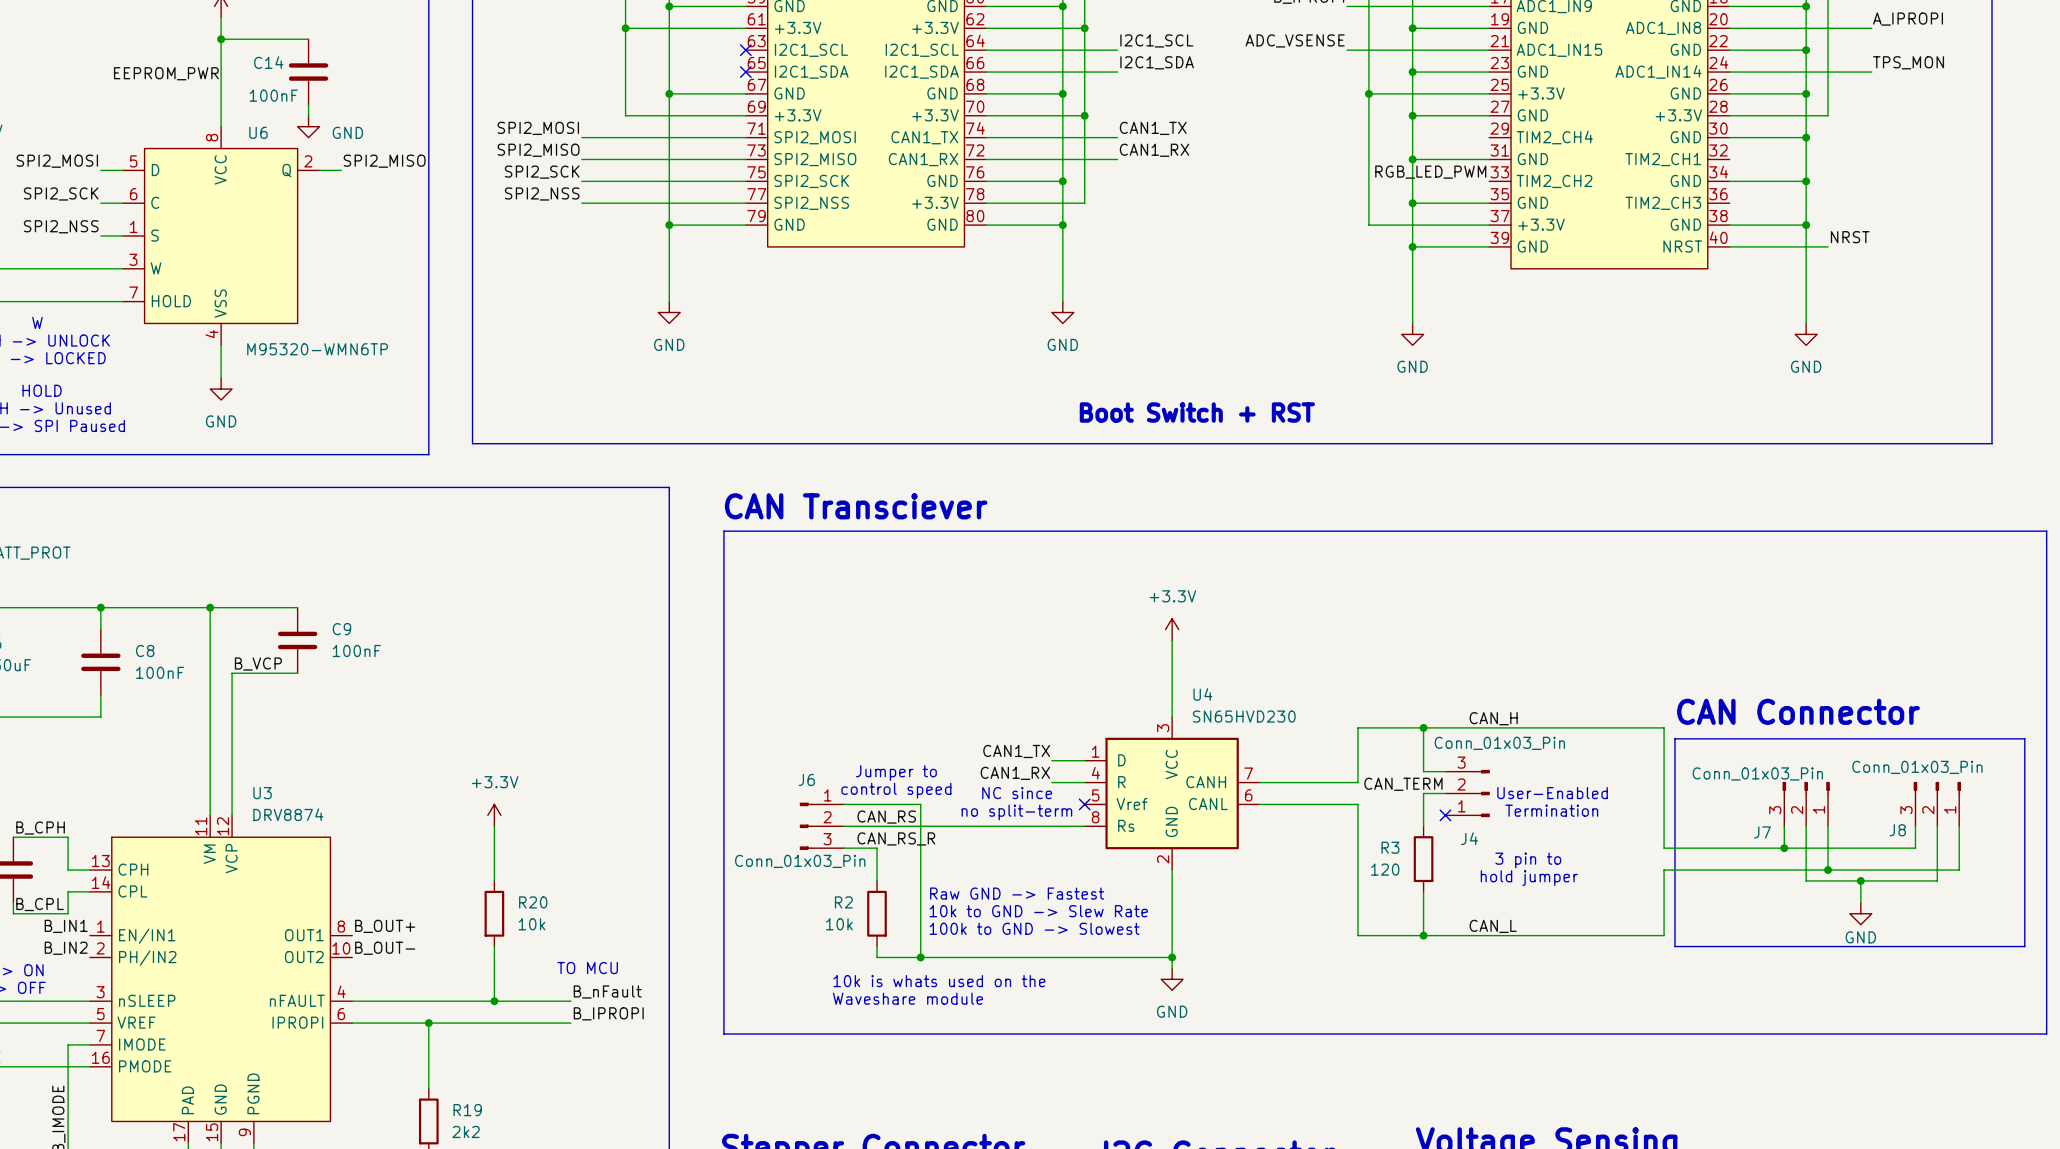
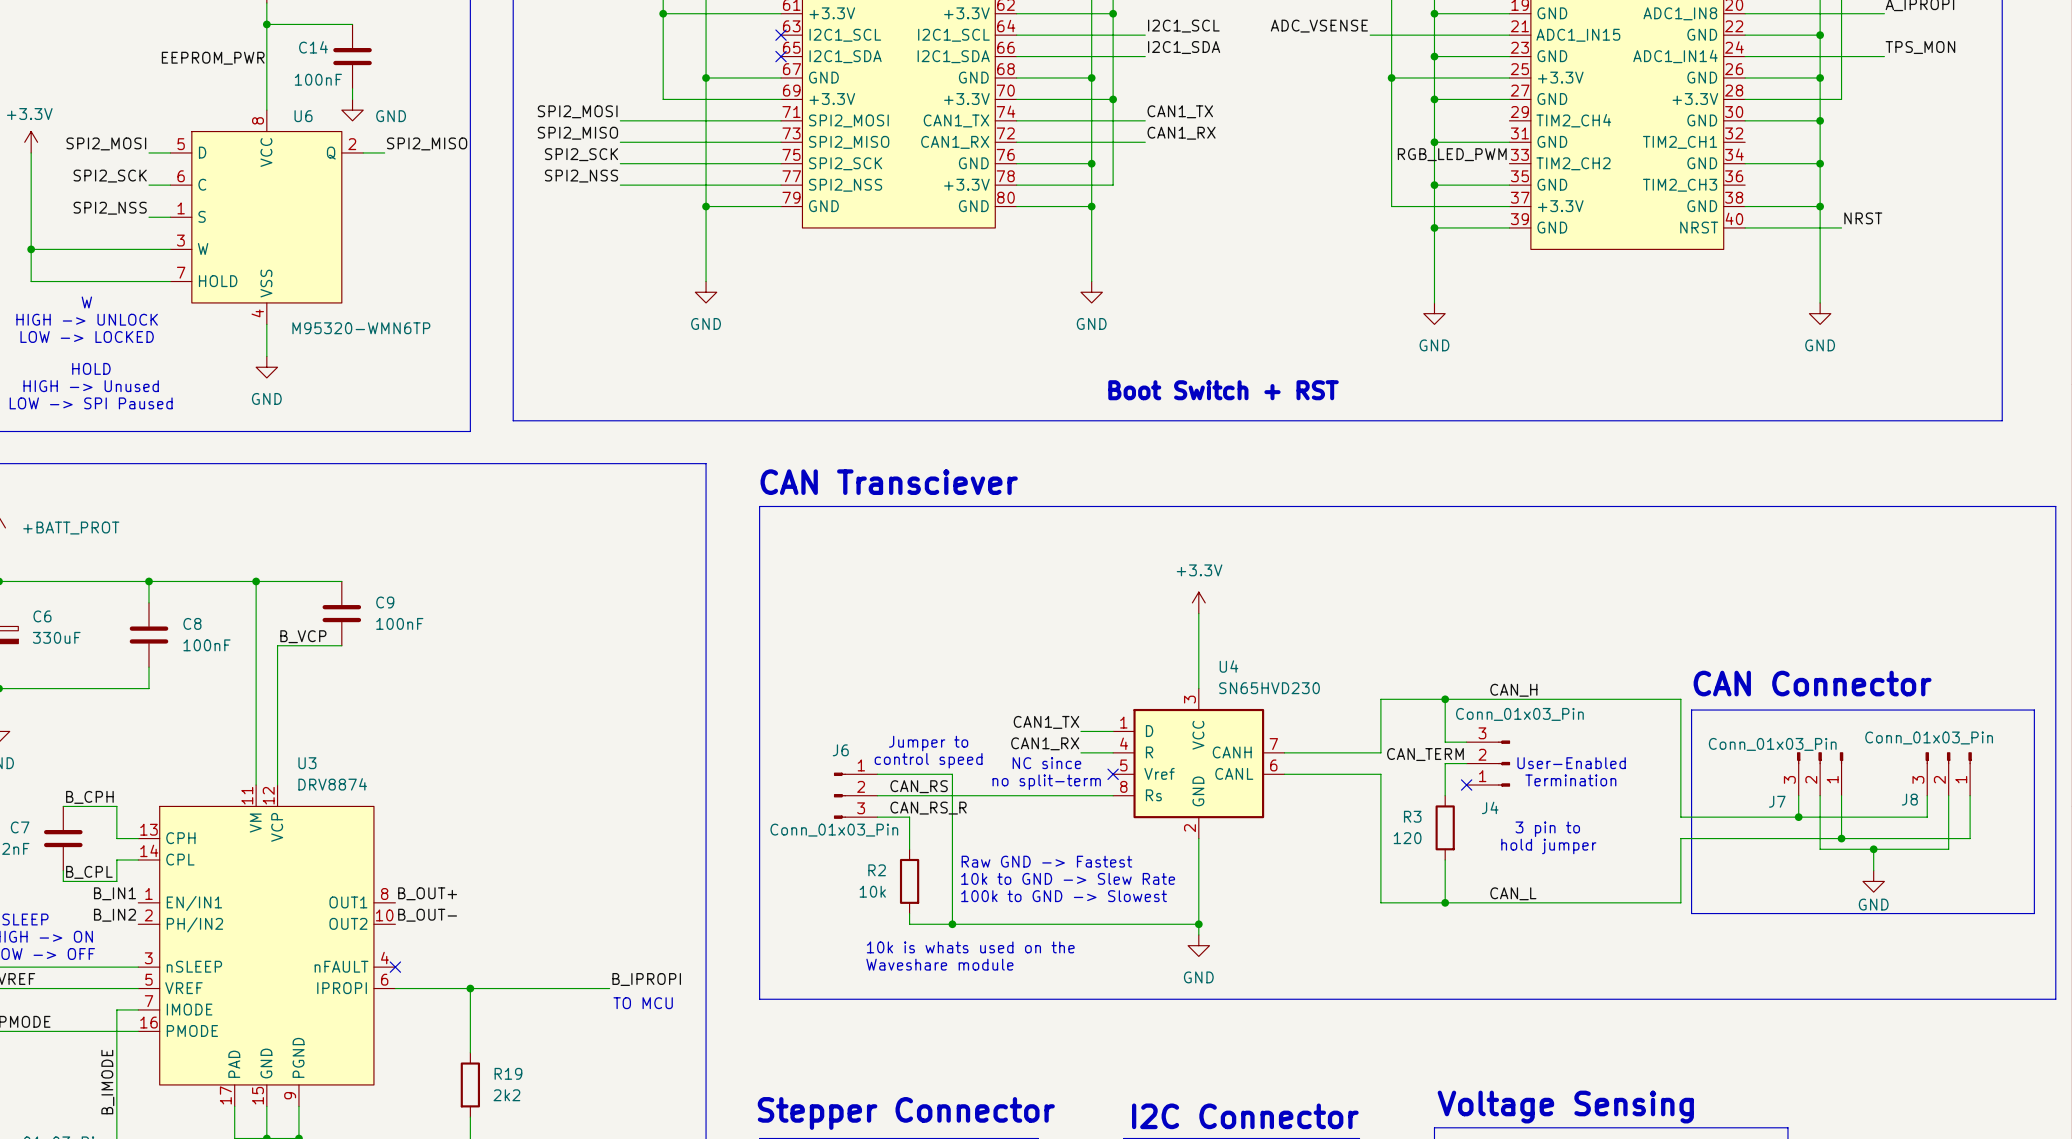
power symbol: +3.3V (494, 815) -> none
wire: (494, 826) (494, 880) -> none
R20: 10k (494, 913) -> none
wire: (494, 946) (494, 1001) -> none
text position: TO MCU (587, 968) -> TO MCU (643, 1003)
label: B_nFault (607, 991) -> none
wire: (352, 1001) (570, 1001) -> none
no-connect mark: none -> (395, 967)
junction: (494, 1001) -> none

